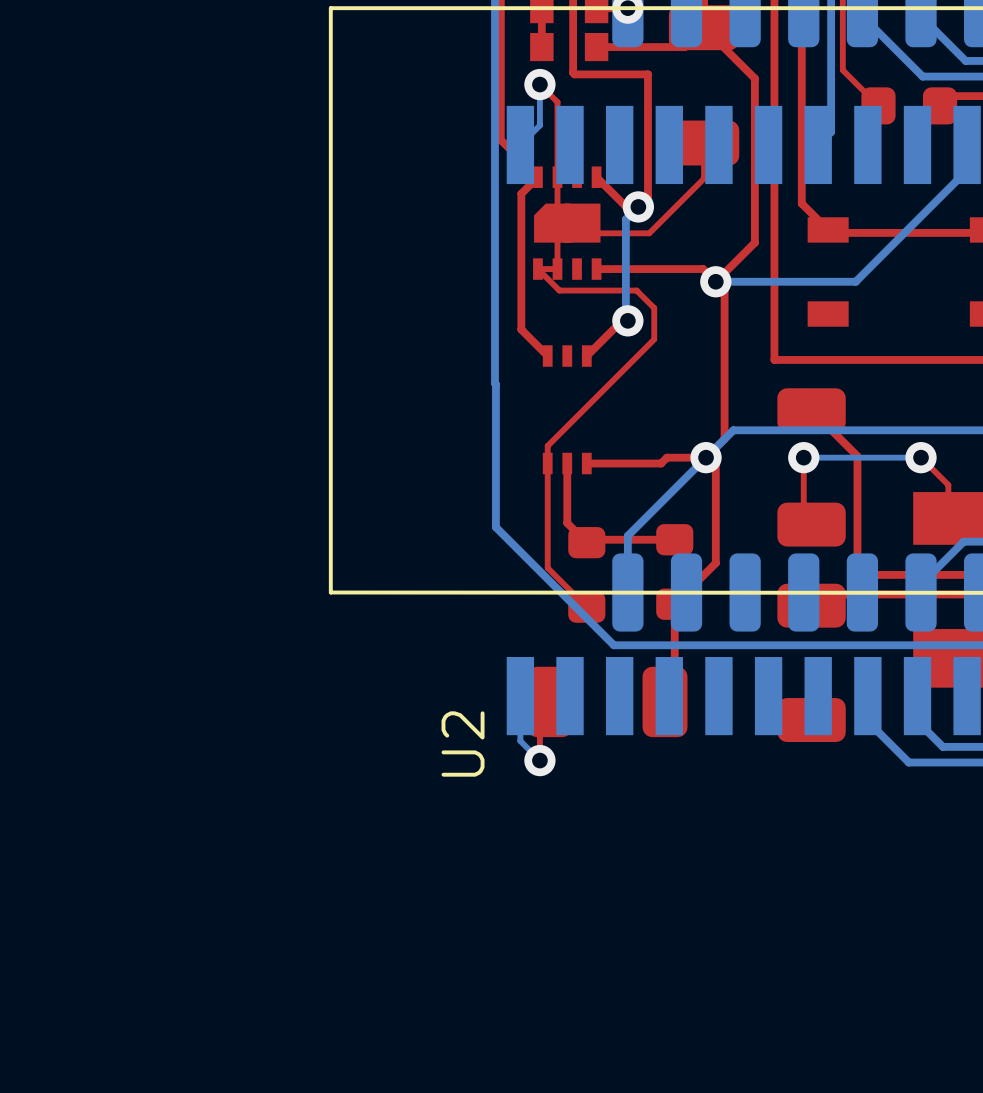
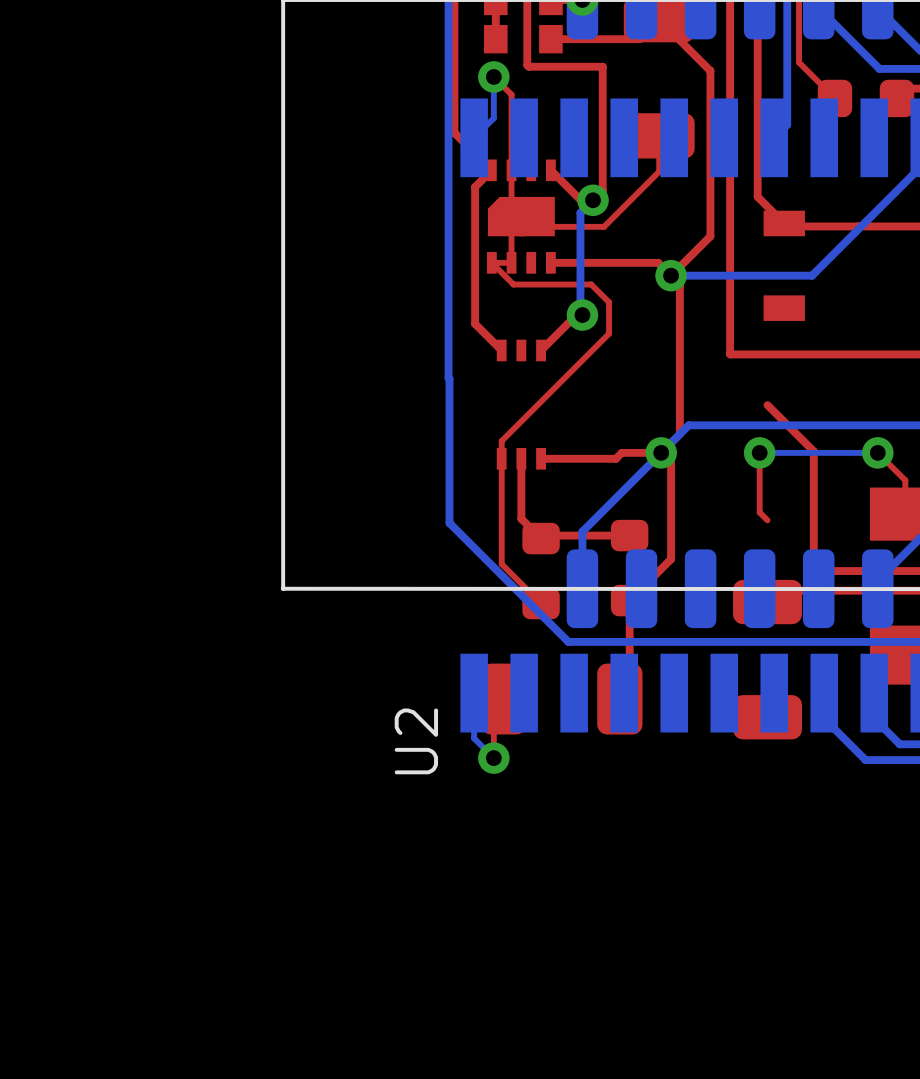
part: (811, 467) -> none

